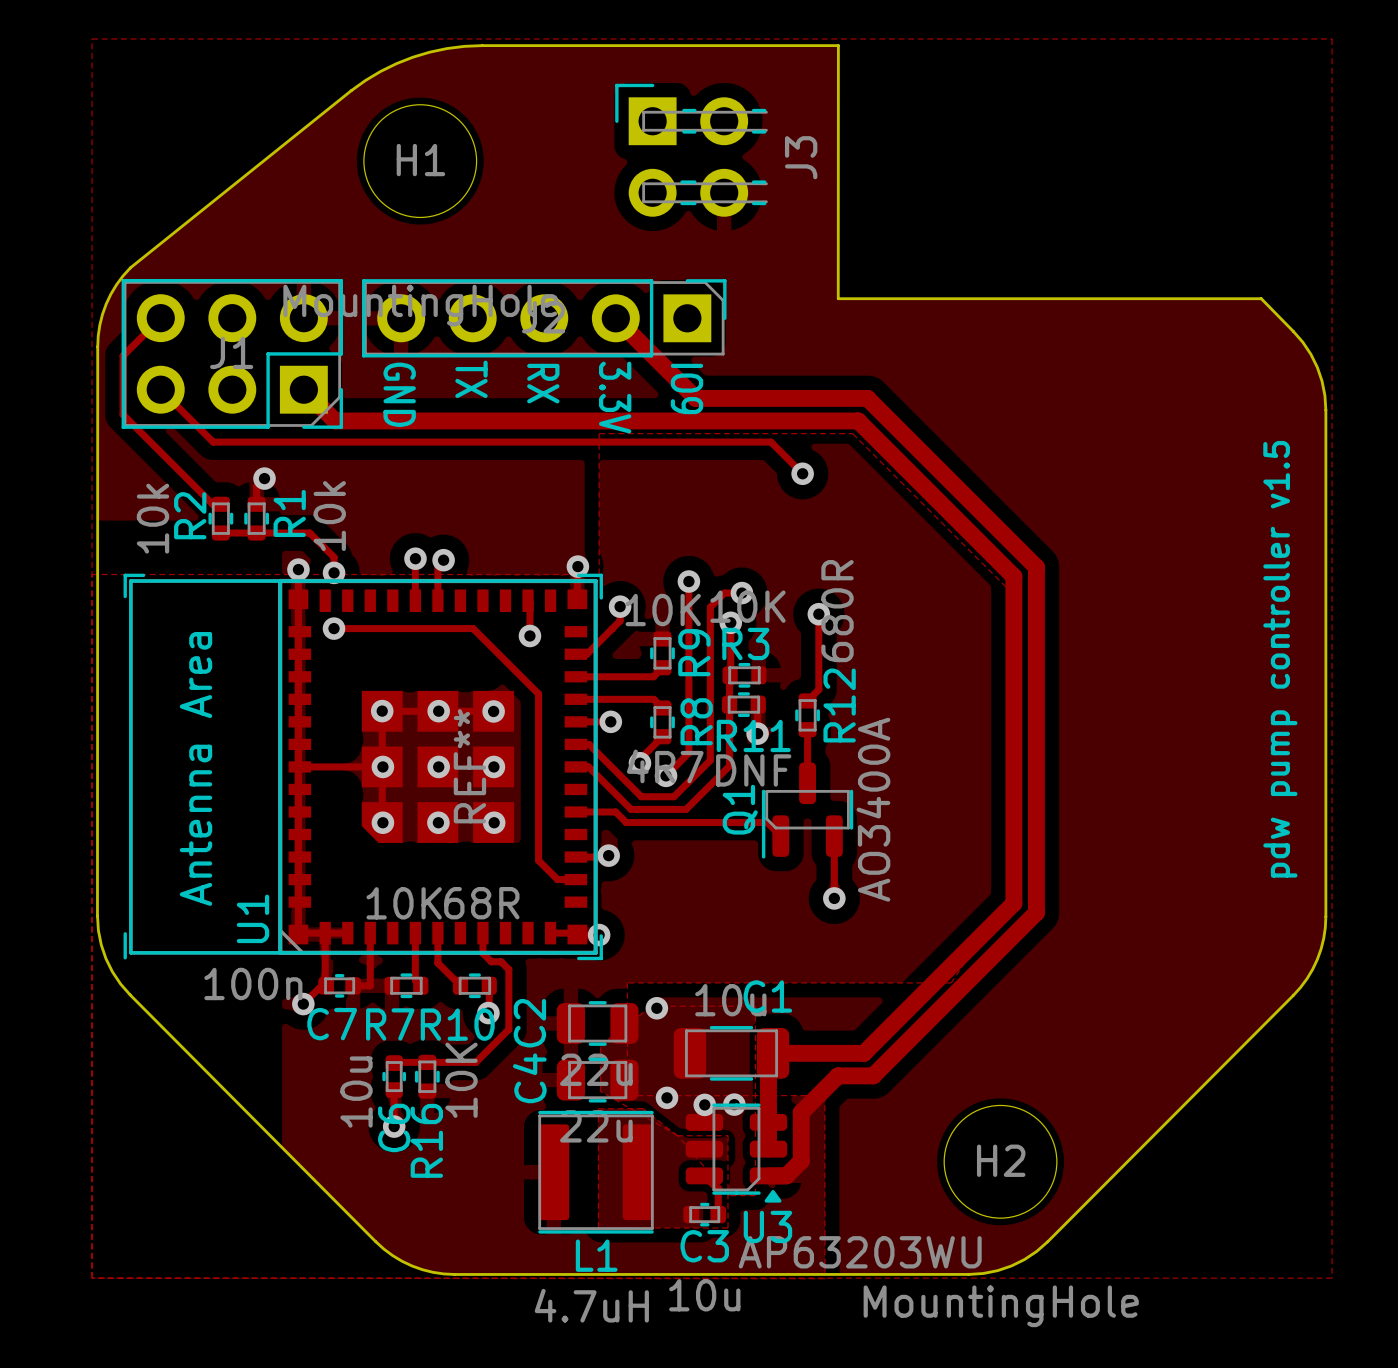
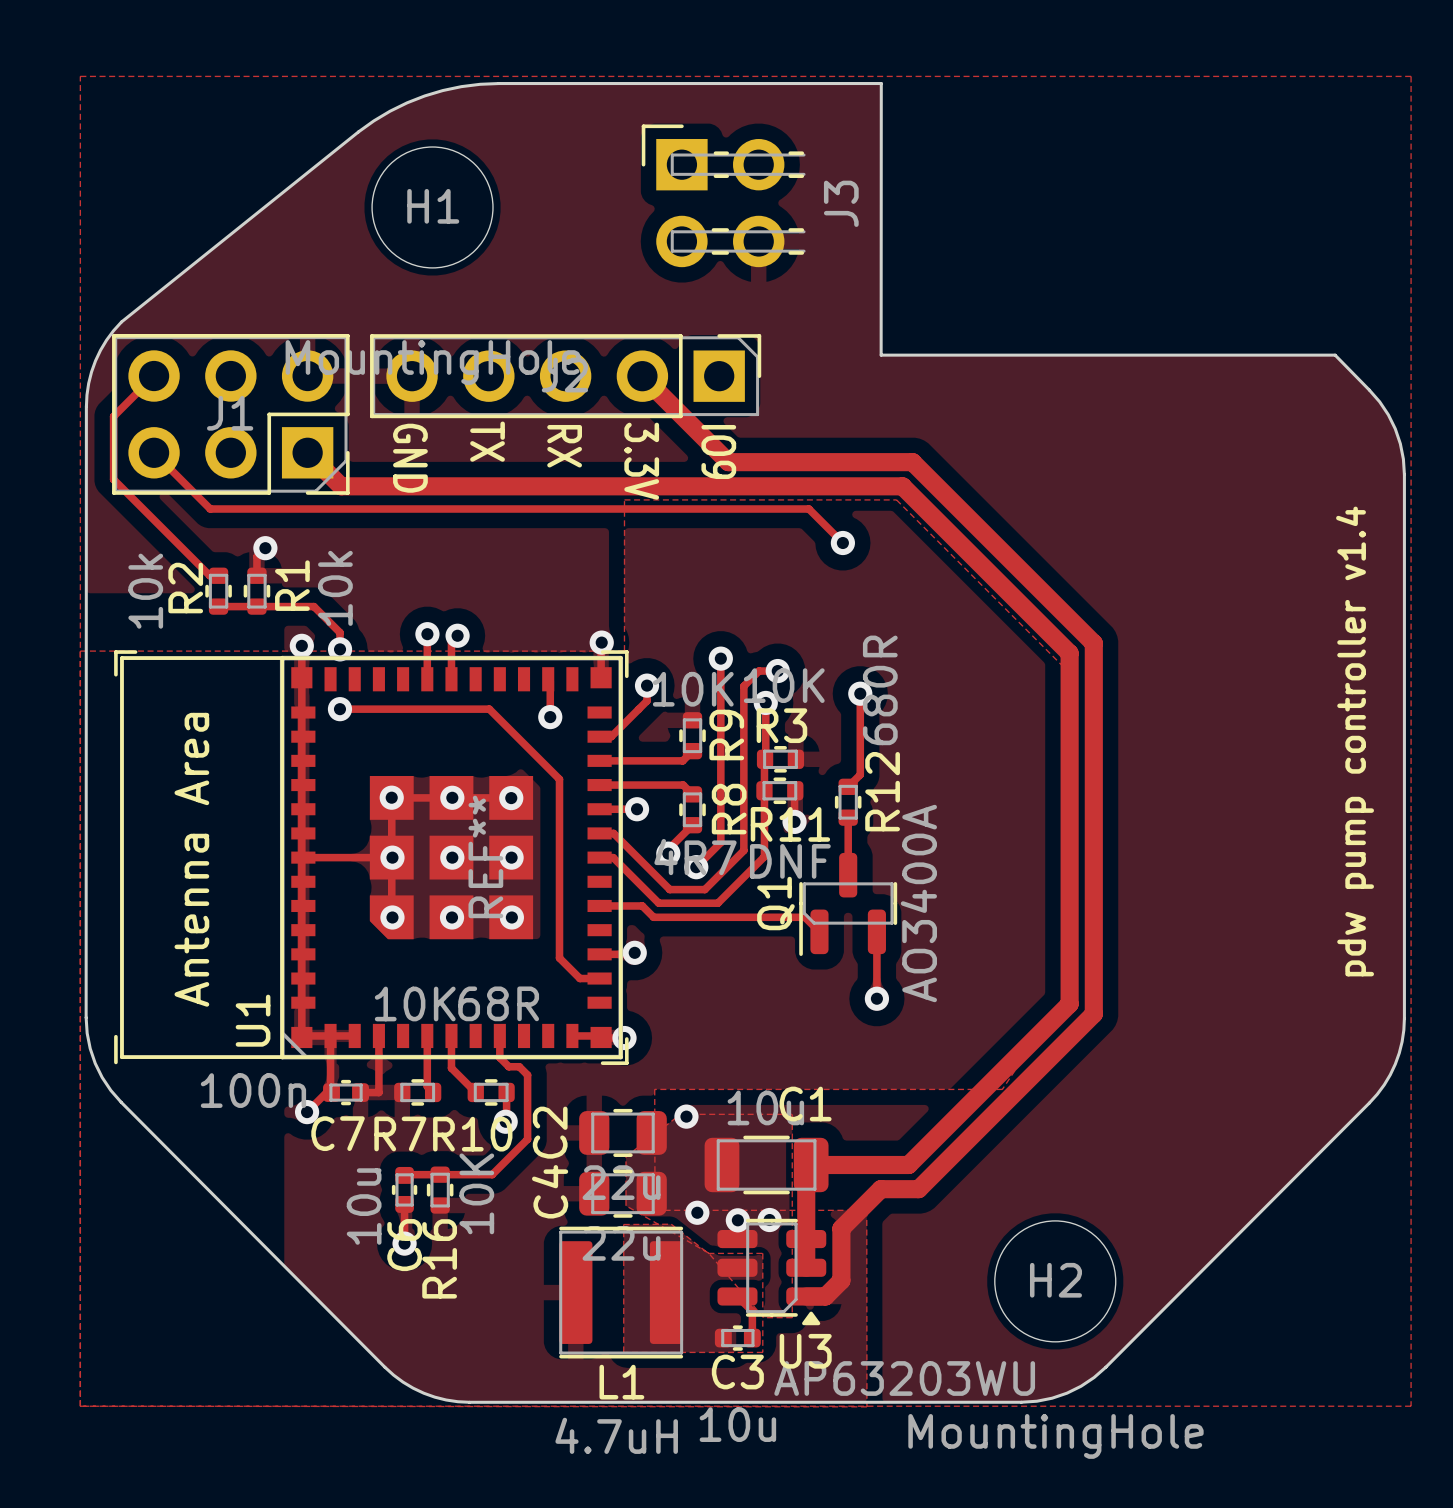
text: pdw pump controller v1.5 (1280, 659) -> pdw pump controller v1.4 (1355, 741)

